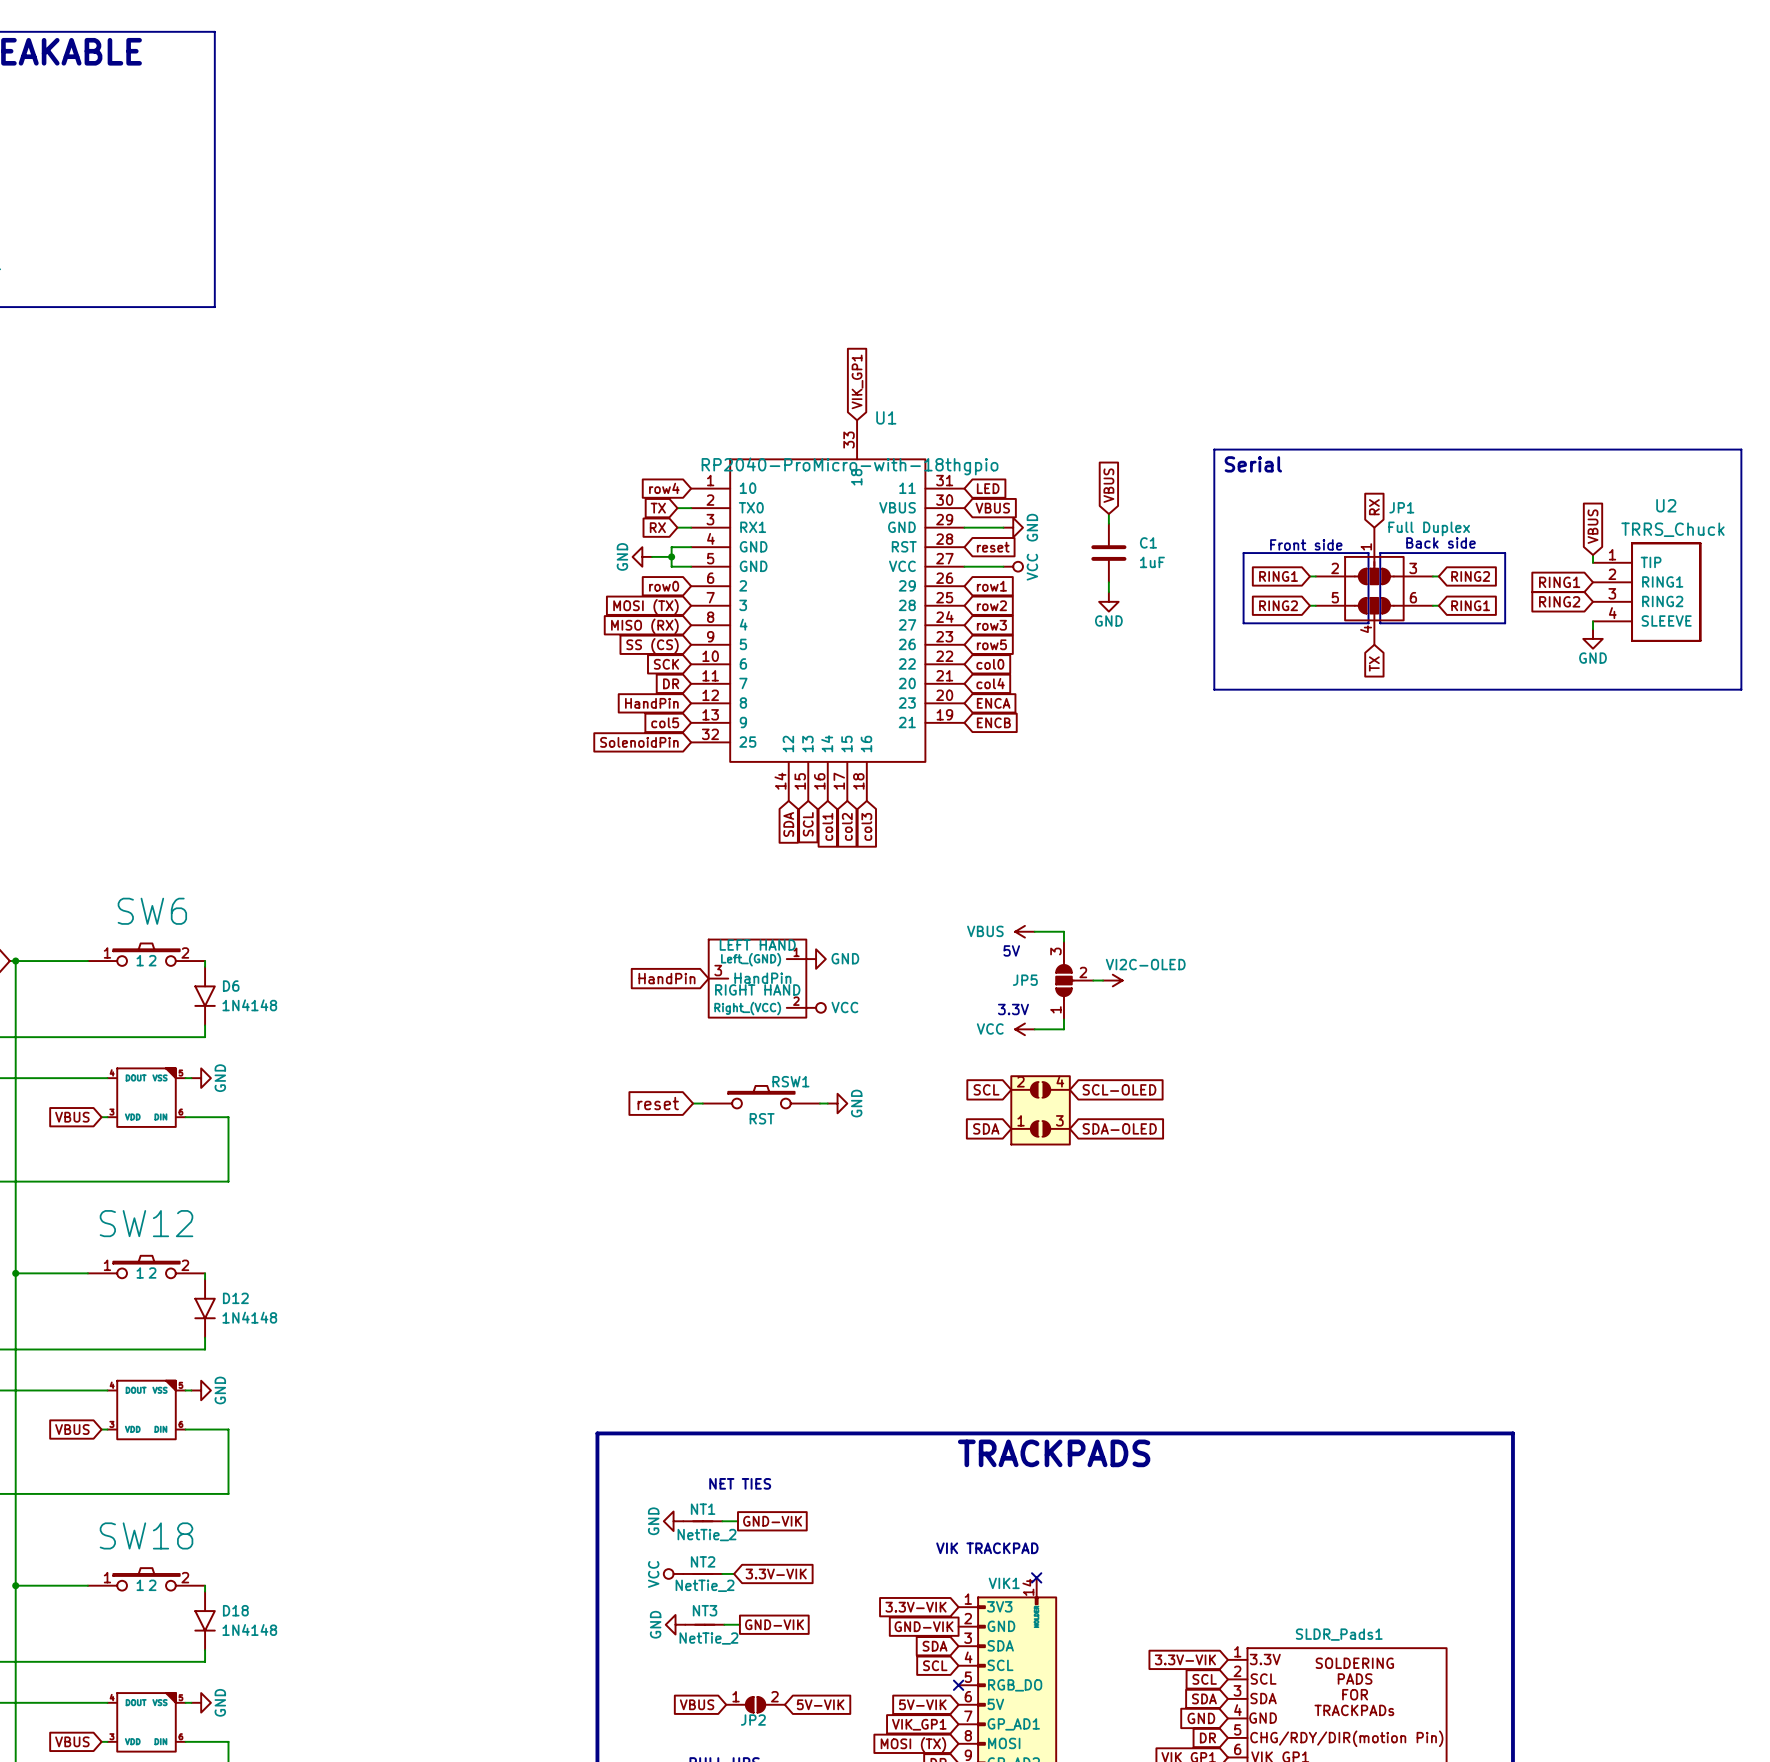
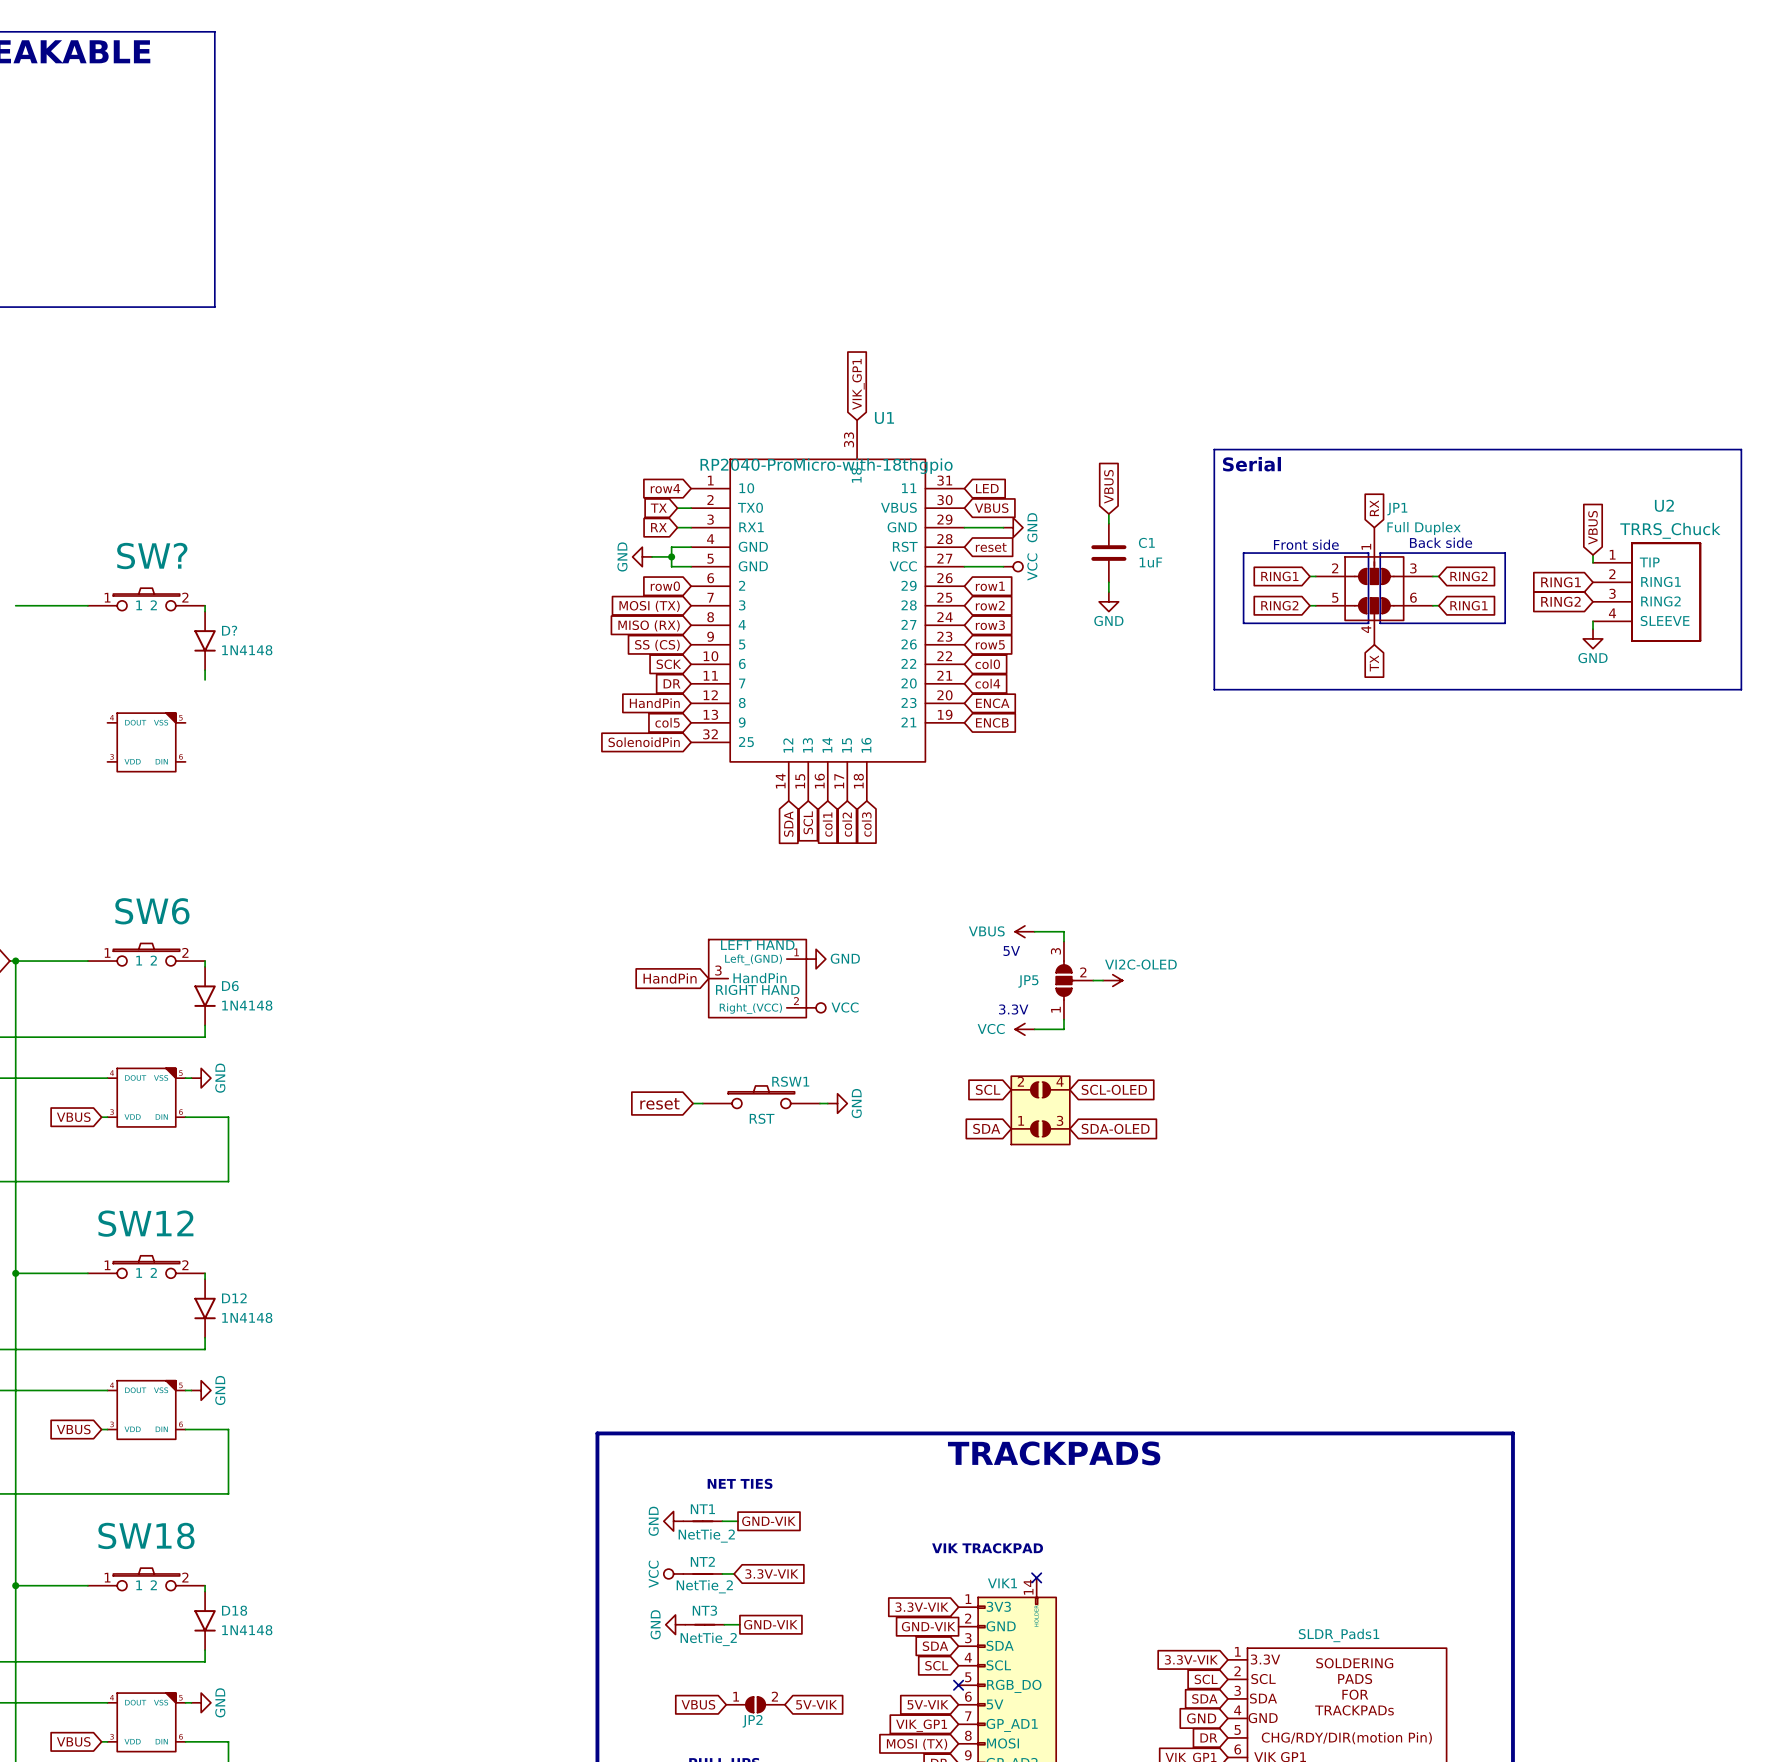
wire: none -> (15, 605) (87, 605)
wire: none -> (205, 605) (205, 611)
D?: none -> 1N4148 (205, 640)
wire: none -> (205, 670) (205, 679)
SW?: none -> (146, 679)

